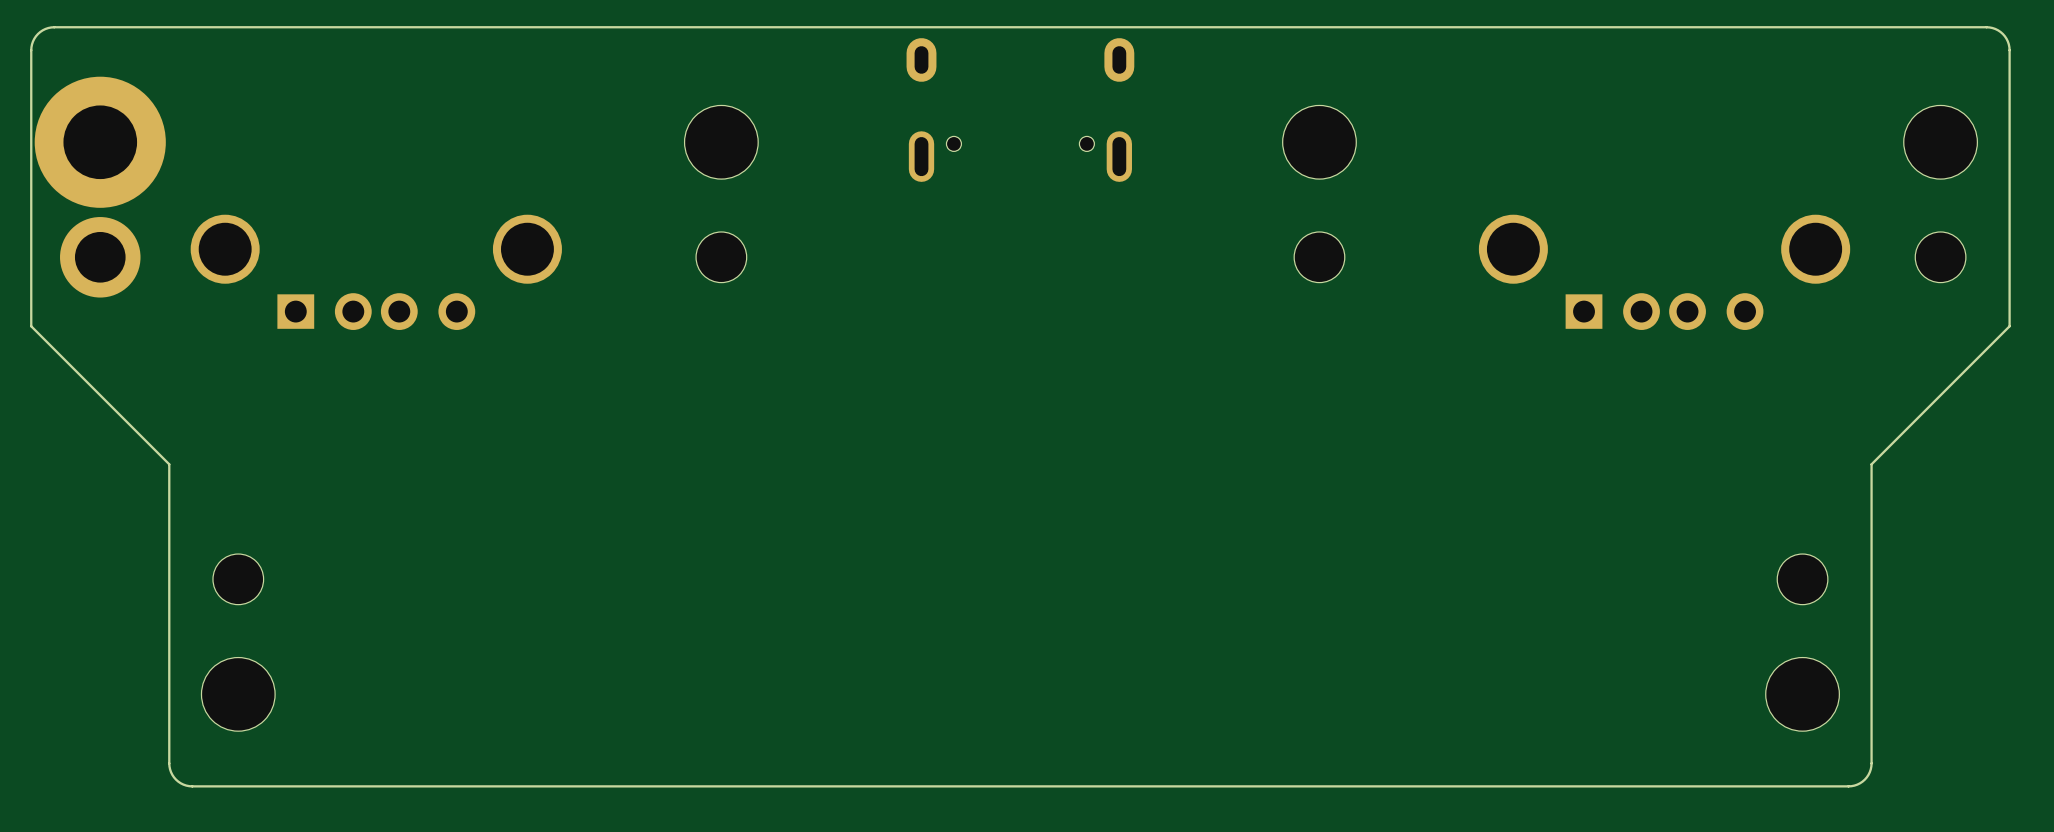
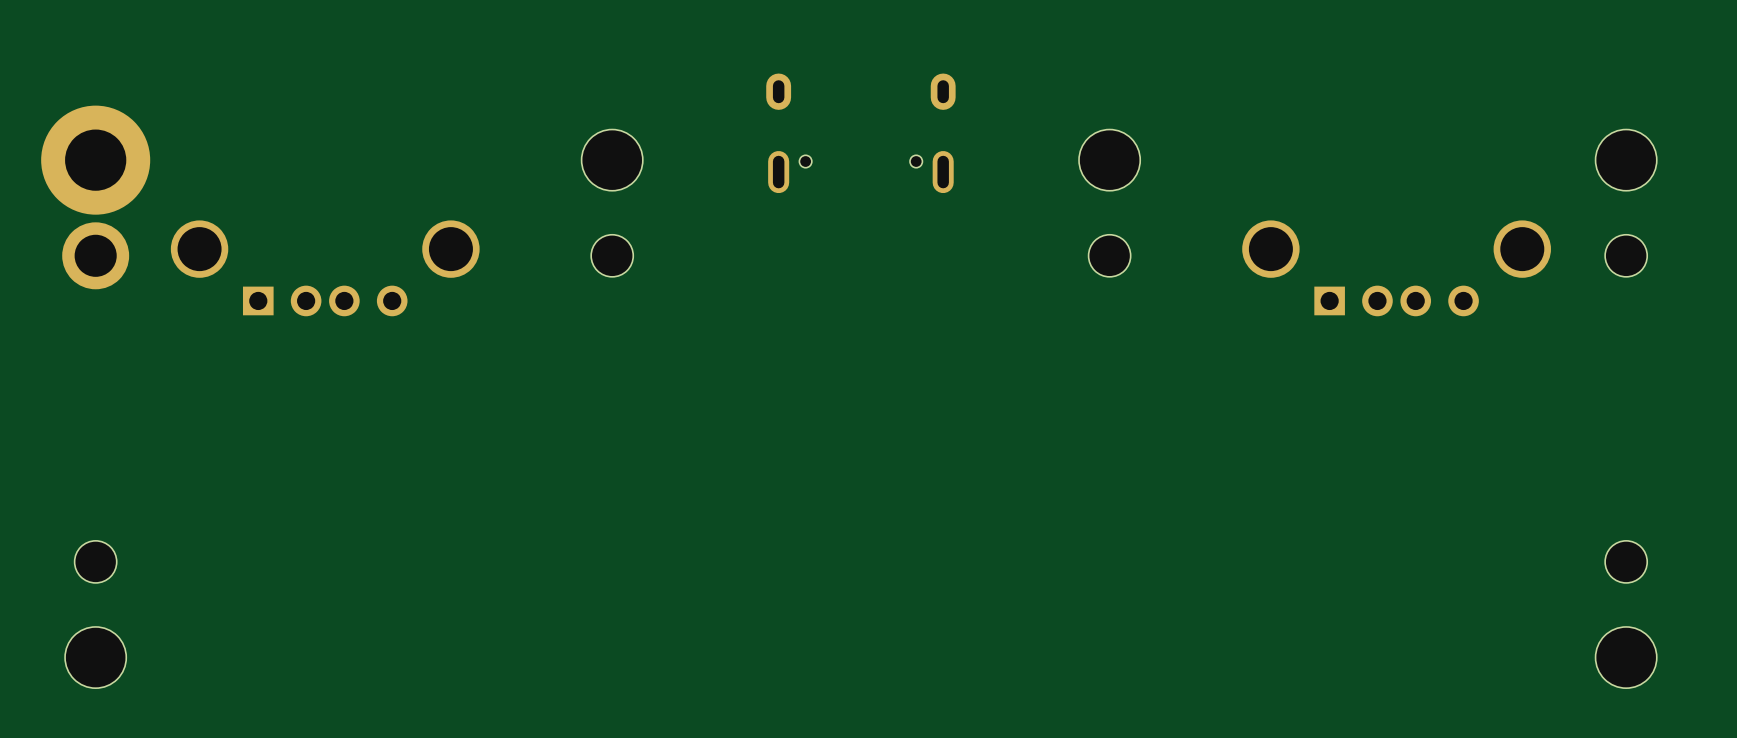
board edge: (1986, 27) (51, 27) (37, 33) (31, 47) (31, 326) (169, 464) (169, 763) (174, 777) (186, 785) (1851, 786) (1864, 779) (1869, 772) (1871, 763) (1871, 464) (2009, 326) (2009, 47) (2006, 38) (2000, 32) (1986, 27) -> none
part position: (238, 579) -> (95, 561)
part position: (1802, 579) -> (1626, 561)
part position: (238, 694) -> (95, 657)
part position: (1802, 694) -> (1626, 657)

